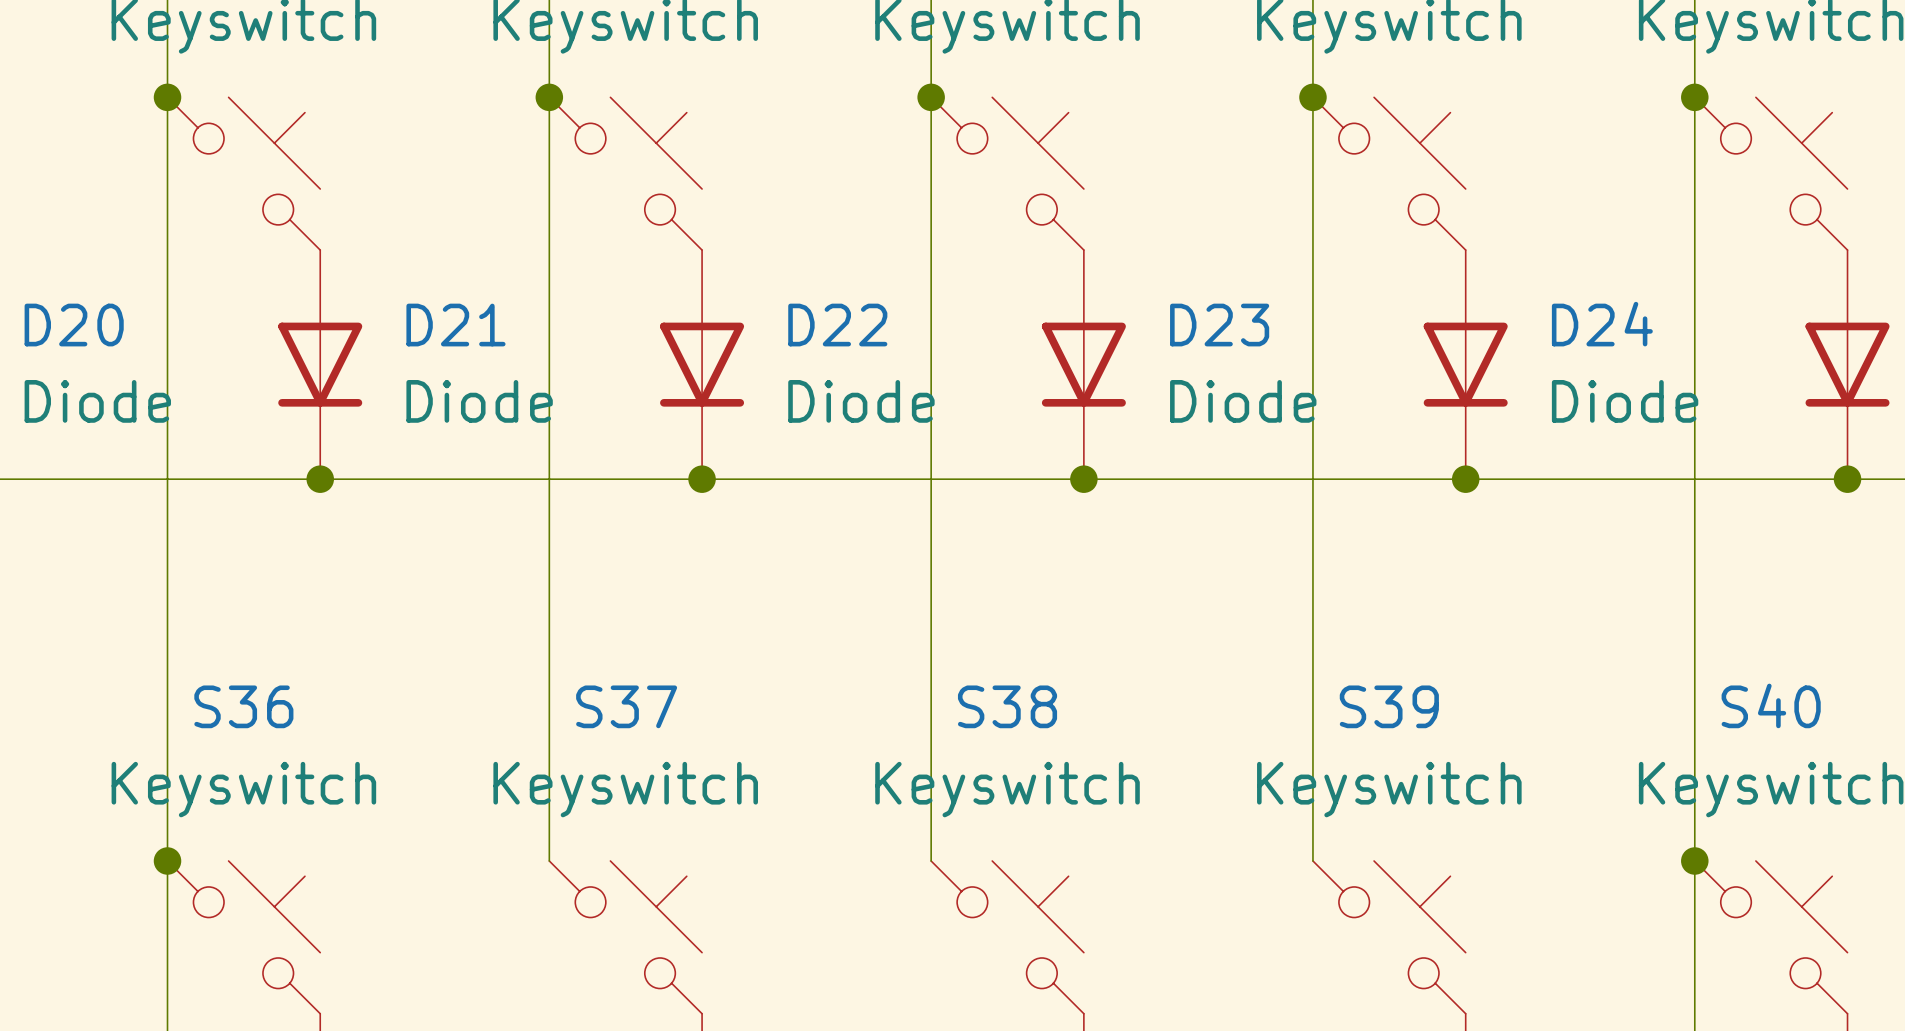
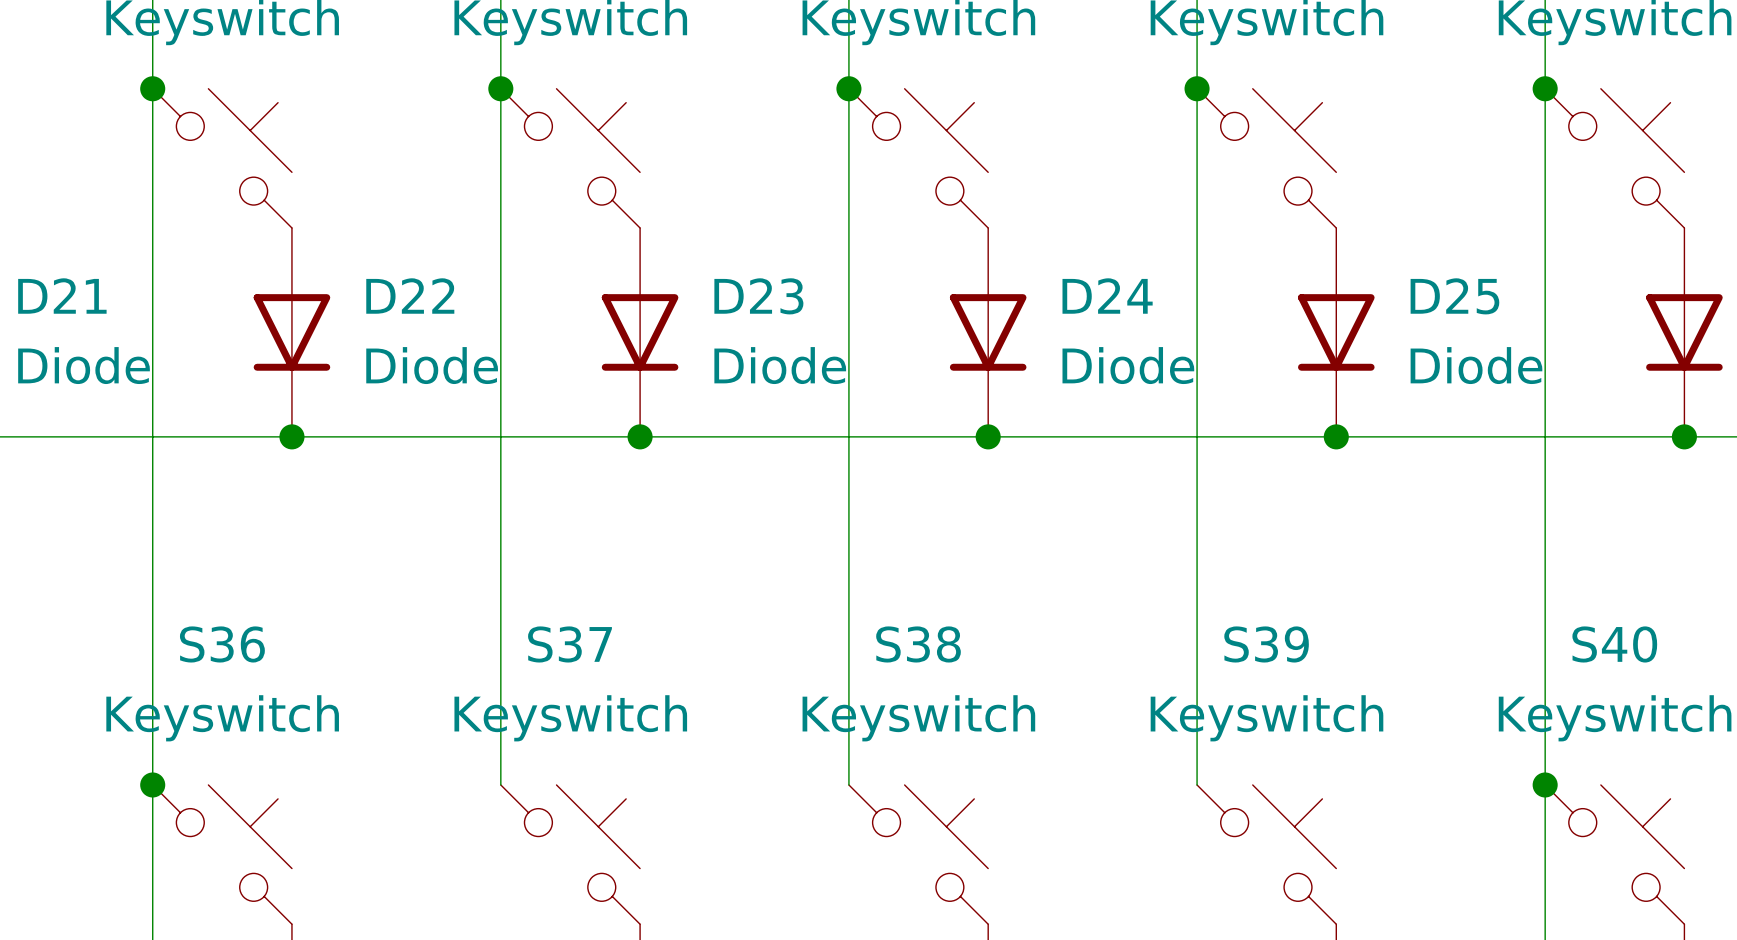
D24 name: D24 (1602, 324) -> D25 (1454, 296)
D20 name: D20 (74, 325) -> D21 (62, 296)
D21 name: D21 (455, 325) -> D22 (410, 296)
D22 name: D22 (837, 325) -> D23 (758, 296)
D23 name: D23 (1219, 325) -> D24 (1107, 296)

